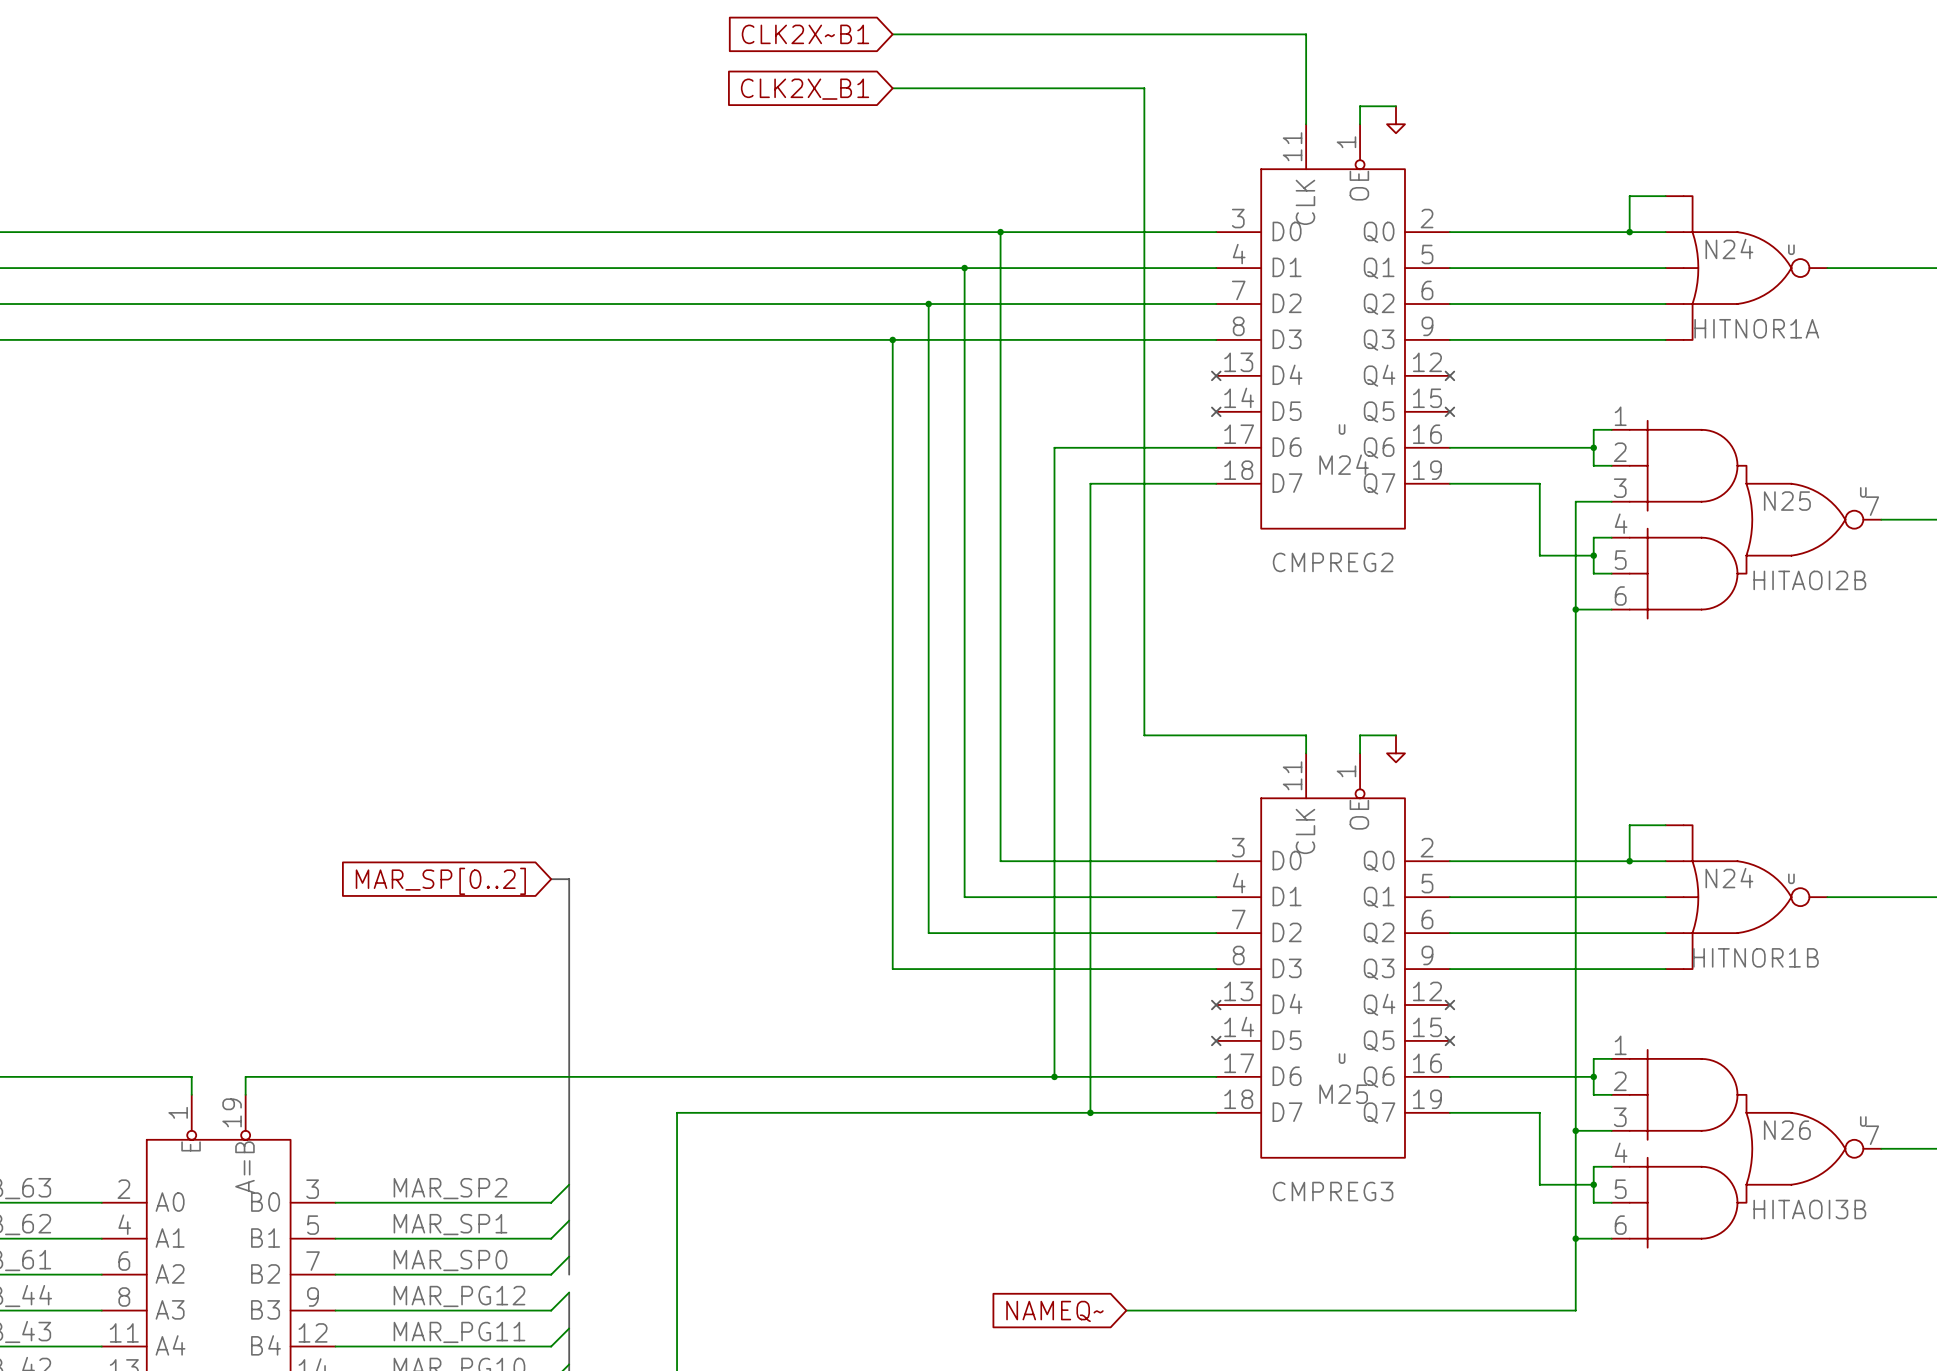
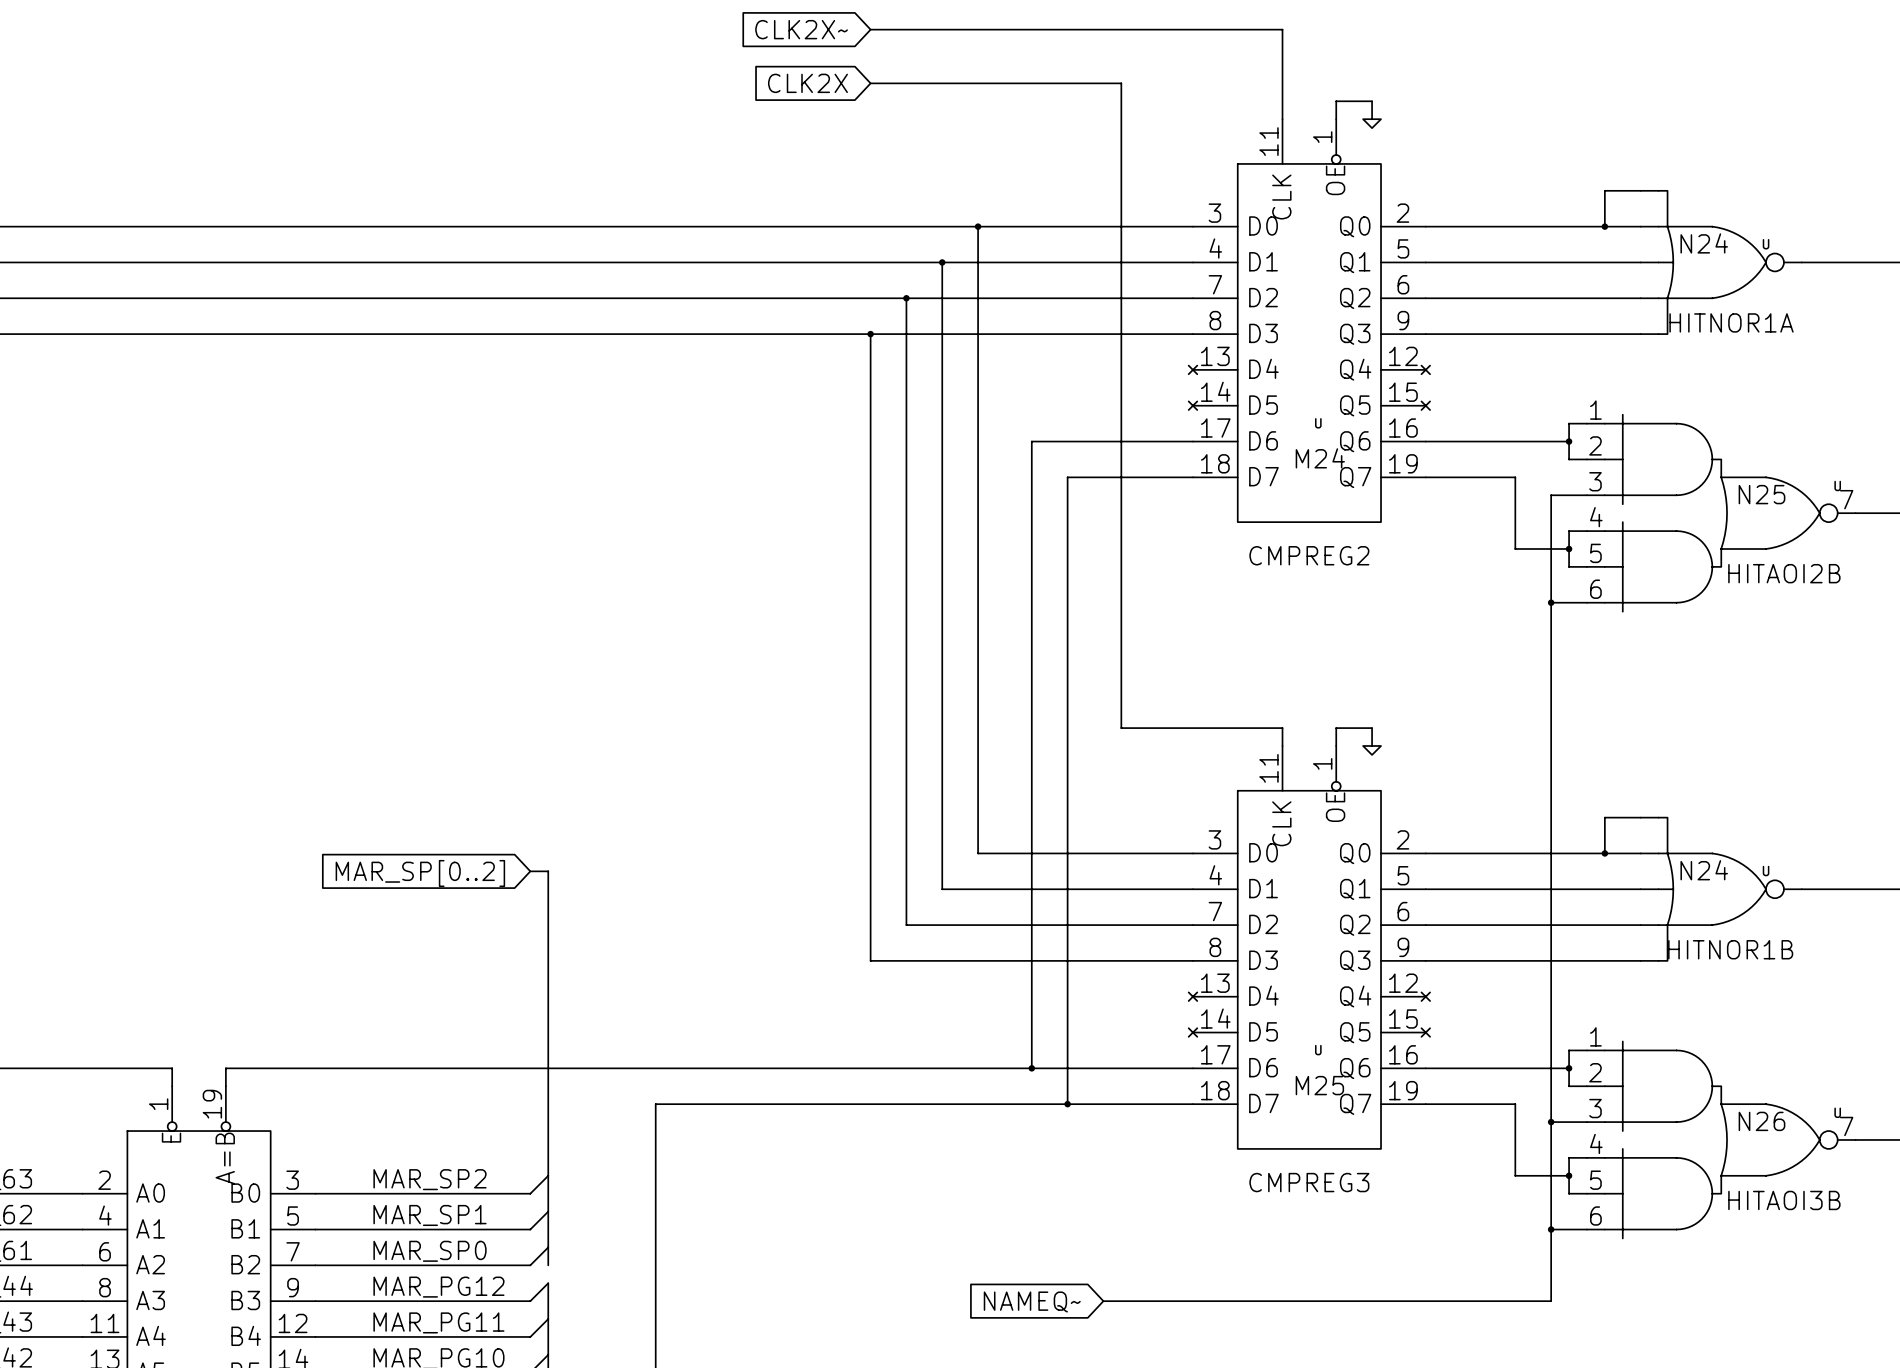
global label: CLK2X~B1 (805, 34) -> CLK2X~ (801, 29)
global label: CLK2X_B1 (805, 89) -> CLK2X (807, 83)

